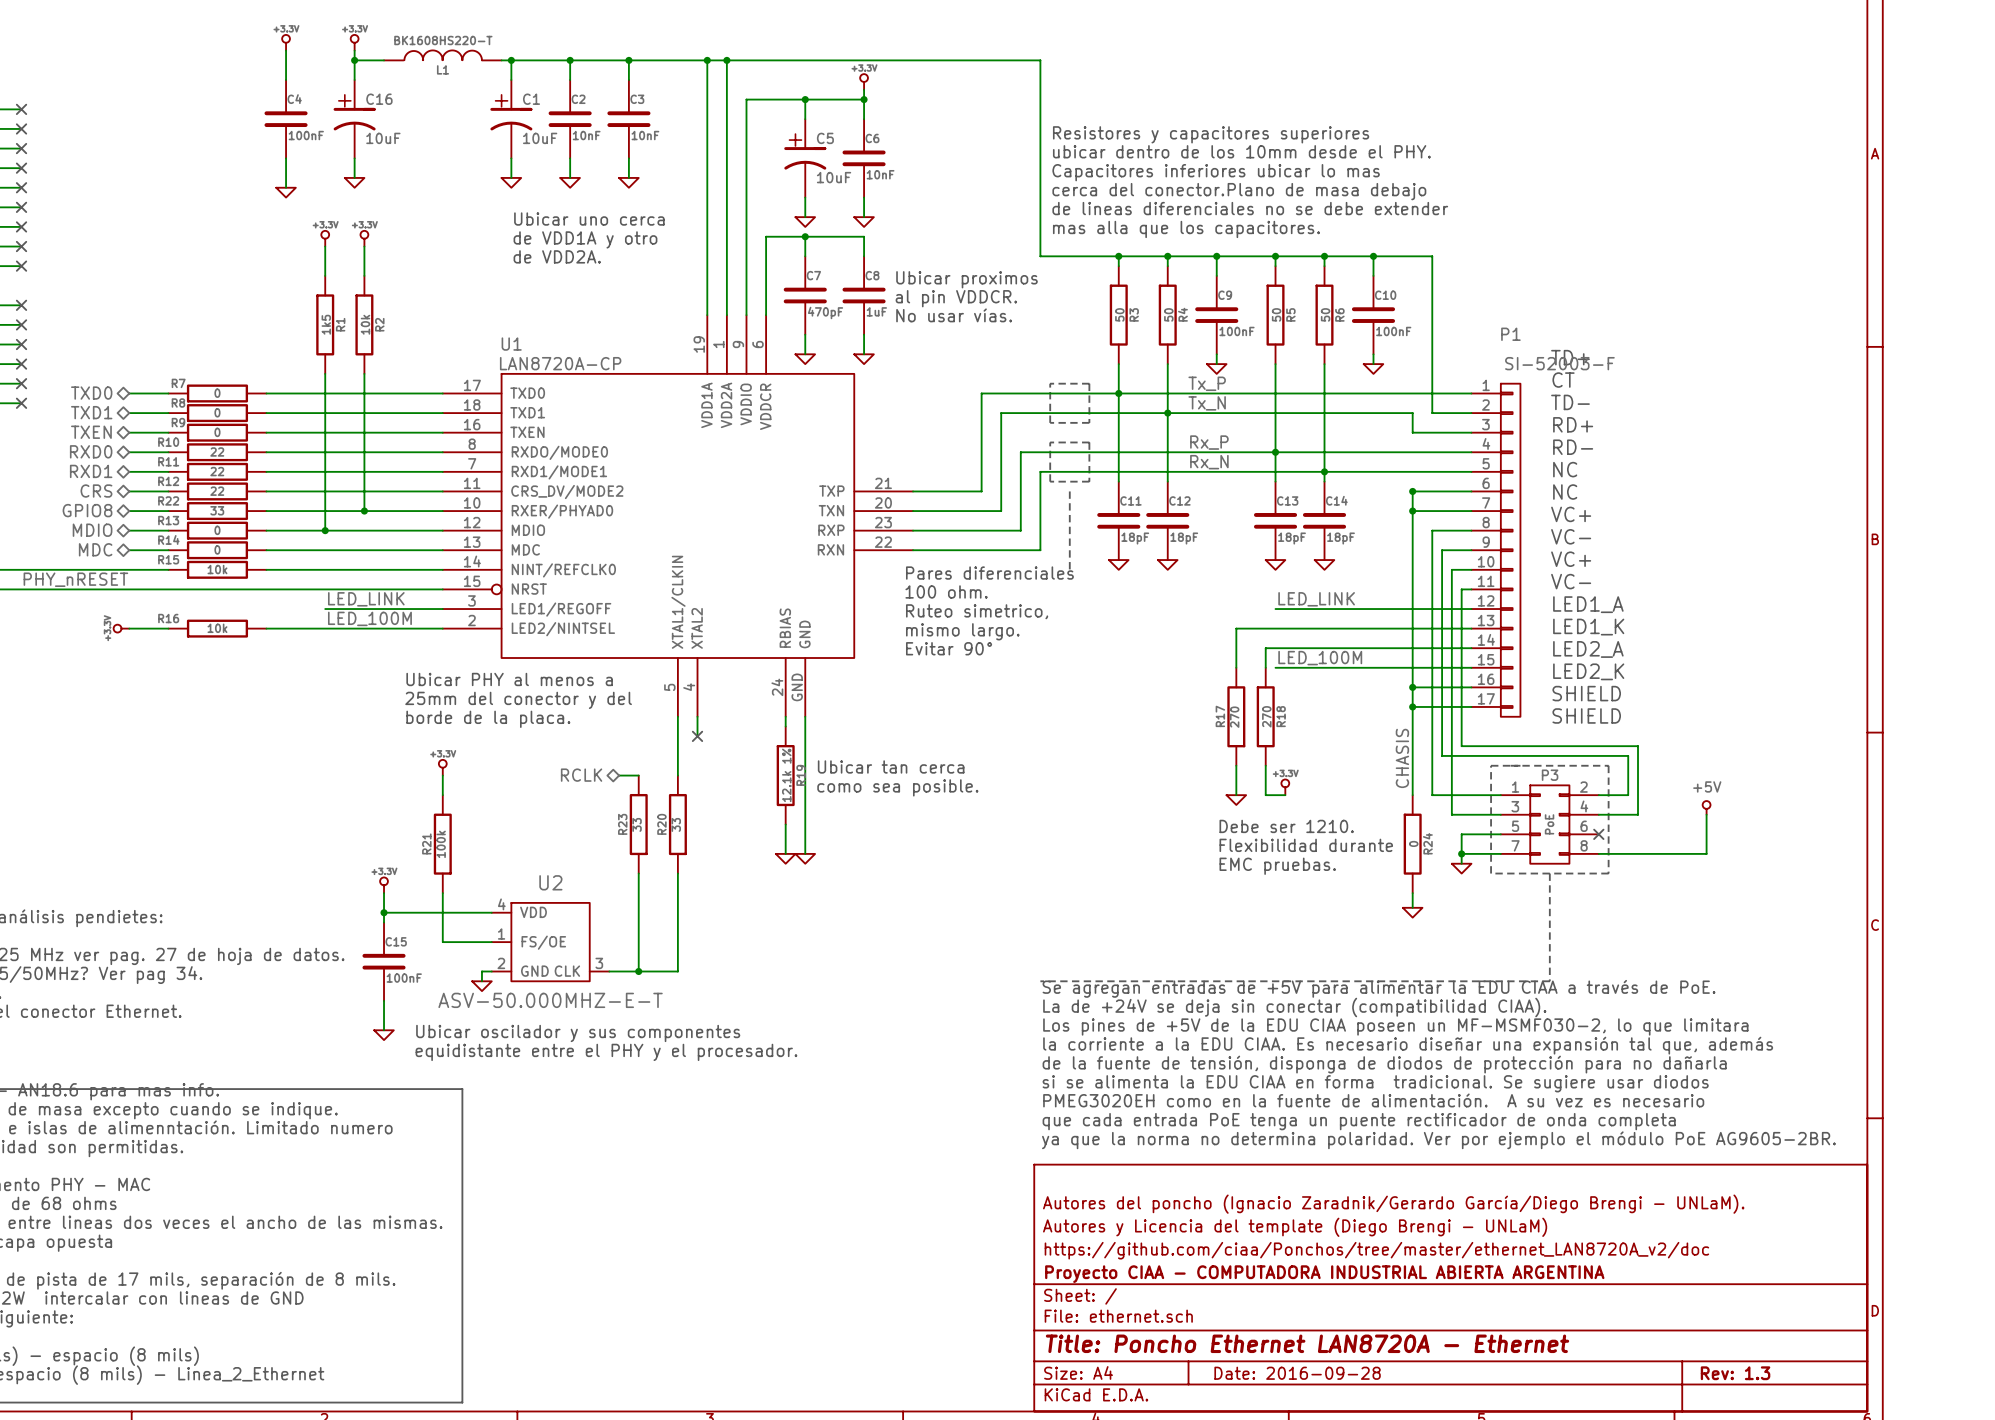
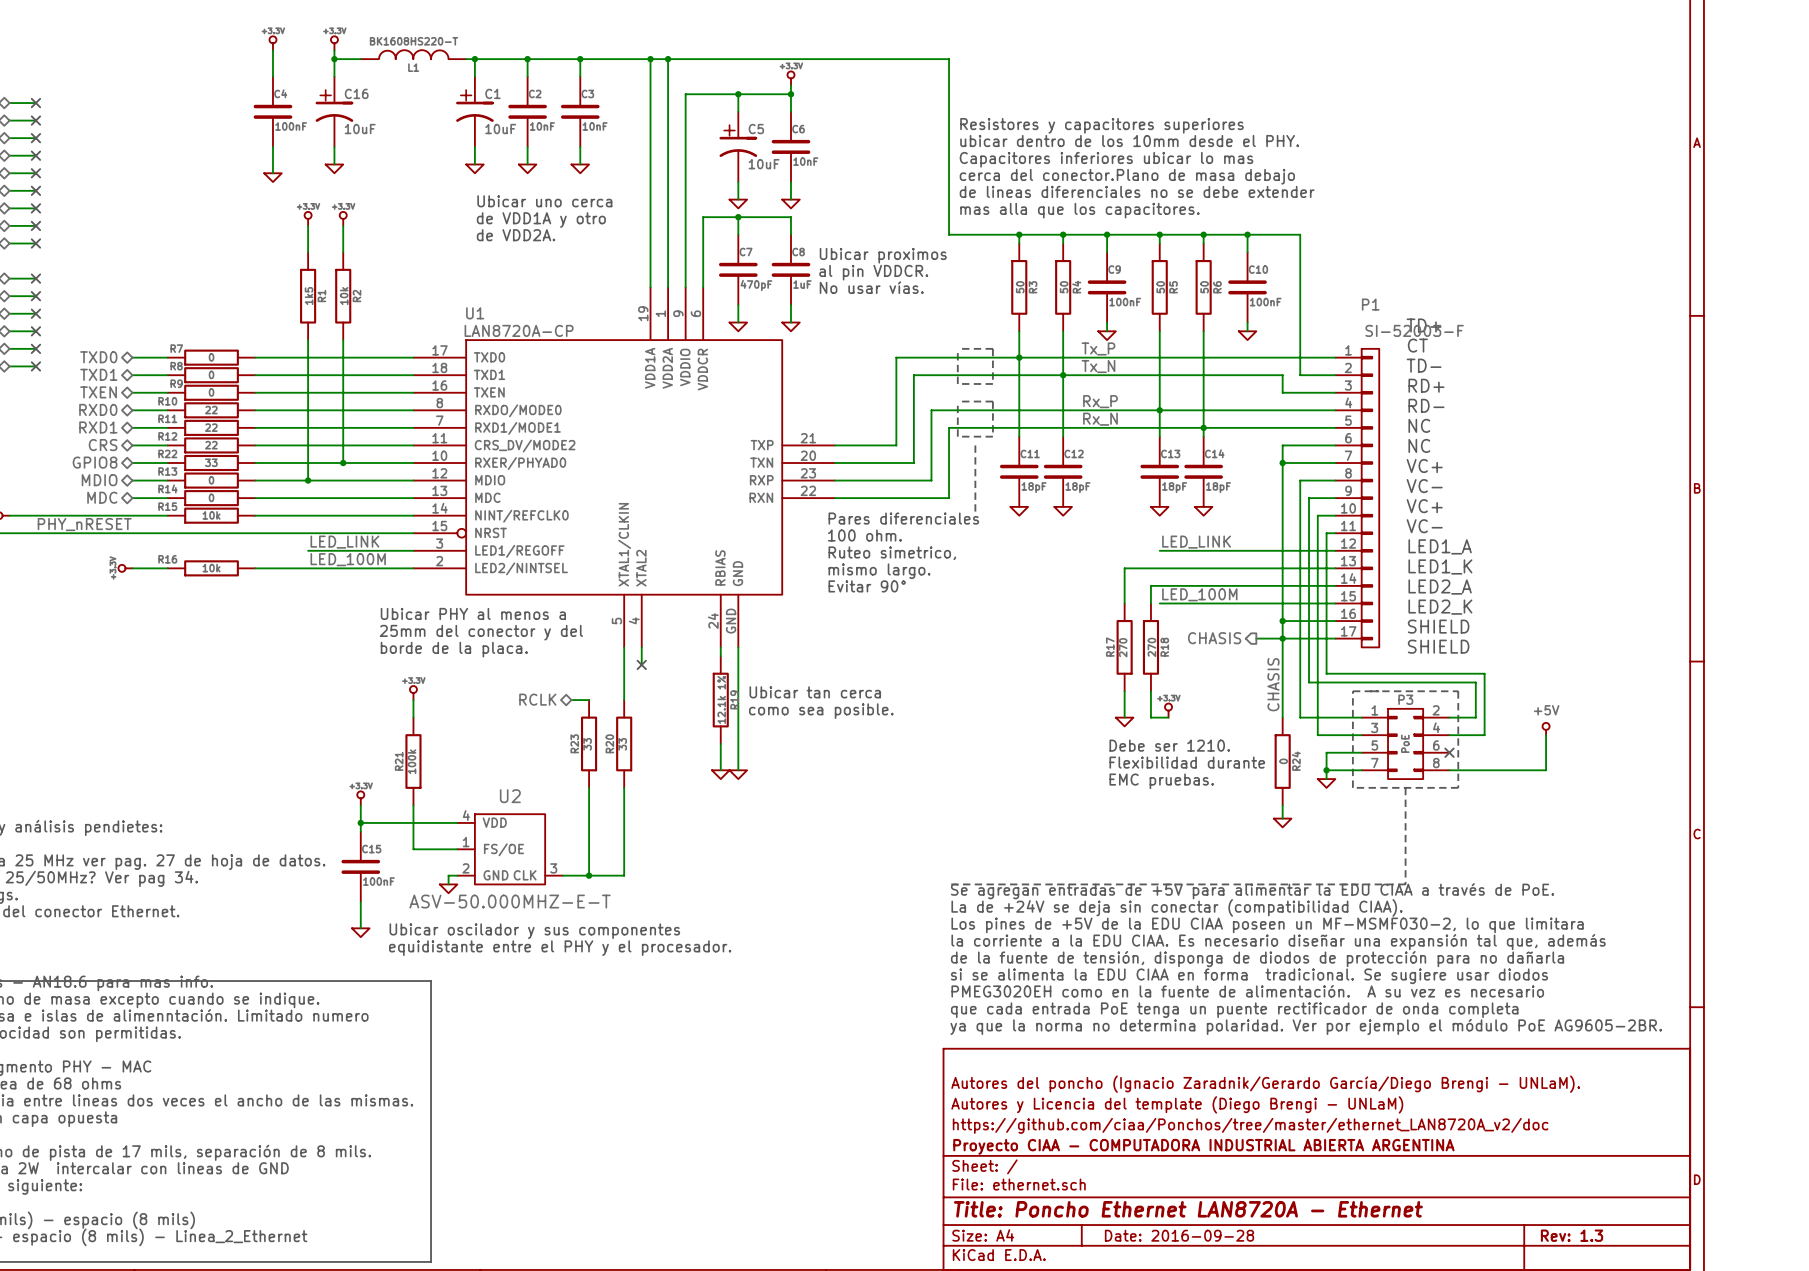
junction: (1412, 491) -> none
hierarchical label: none -> CHASIS (1214, 638)
wire: none -> (1256, 638) (1282, 638)

